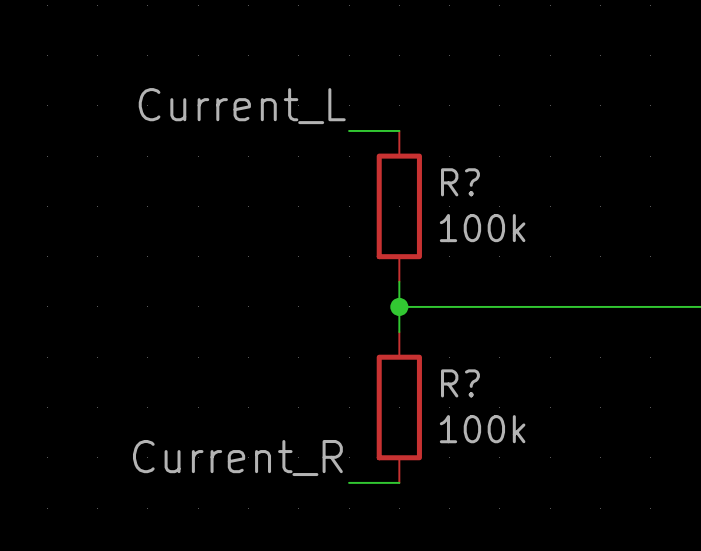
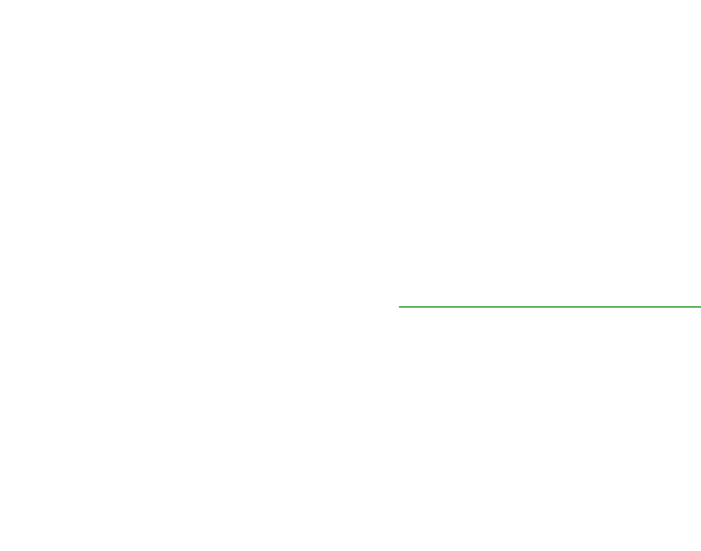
label: Current_L (242, 106) -> none
wire: (349, 130) (399, 130) -> none
R?: 100k (399, 206) -> none
wire: (399, 281) (399, 332) -> none
junction: (399, 306) -> none
R?: 100k (399, 407) -> none
label: Current_R (237, 458) -> none
wire: (349, 482) (399, 482) -> none

